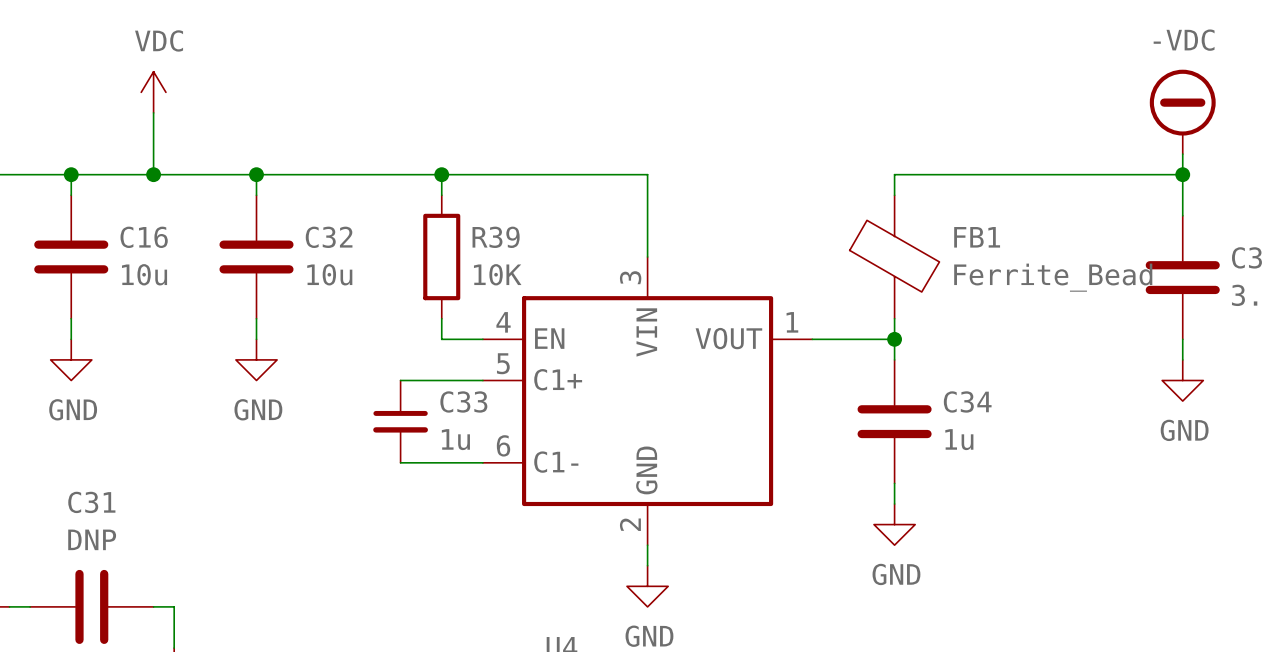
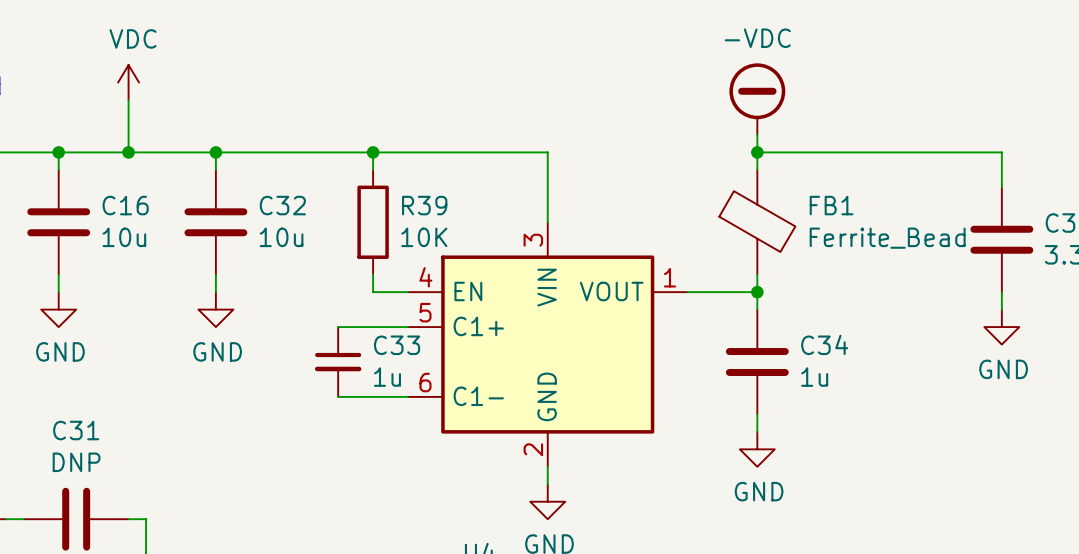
power symbol position: -VDC (1182, 111) -> -VDC (757, 99)
wire: (1182, 154) (1182, 174) -> (757, 134) (757, 152)
junction: none -> (757, 152)
junction: (1182, 174) -> none

